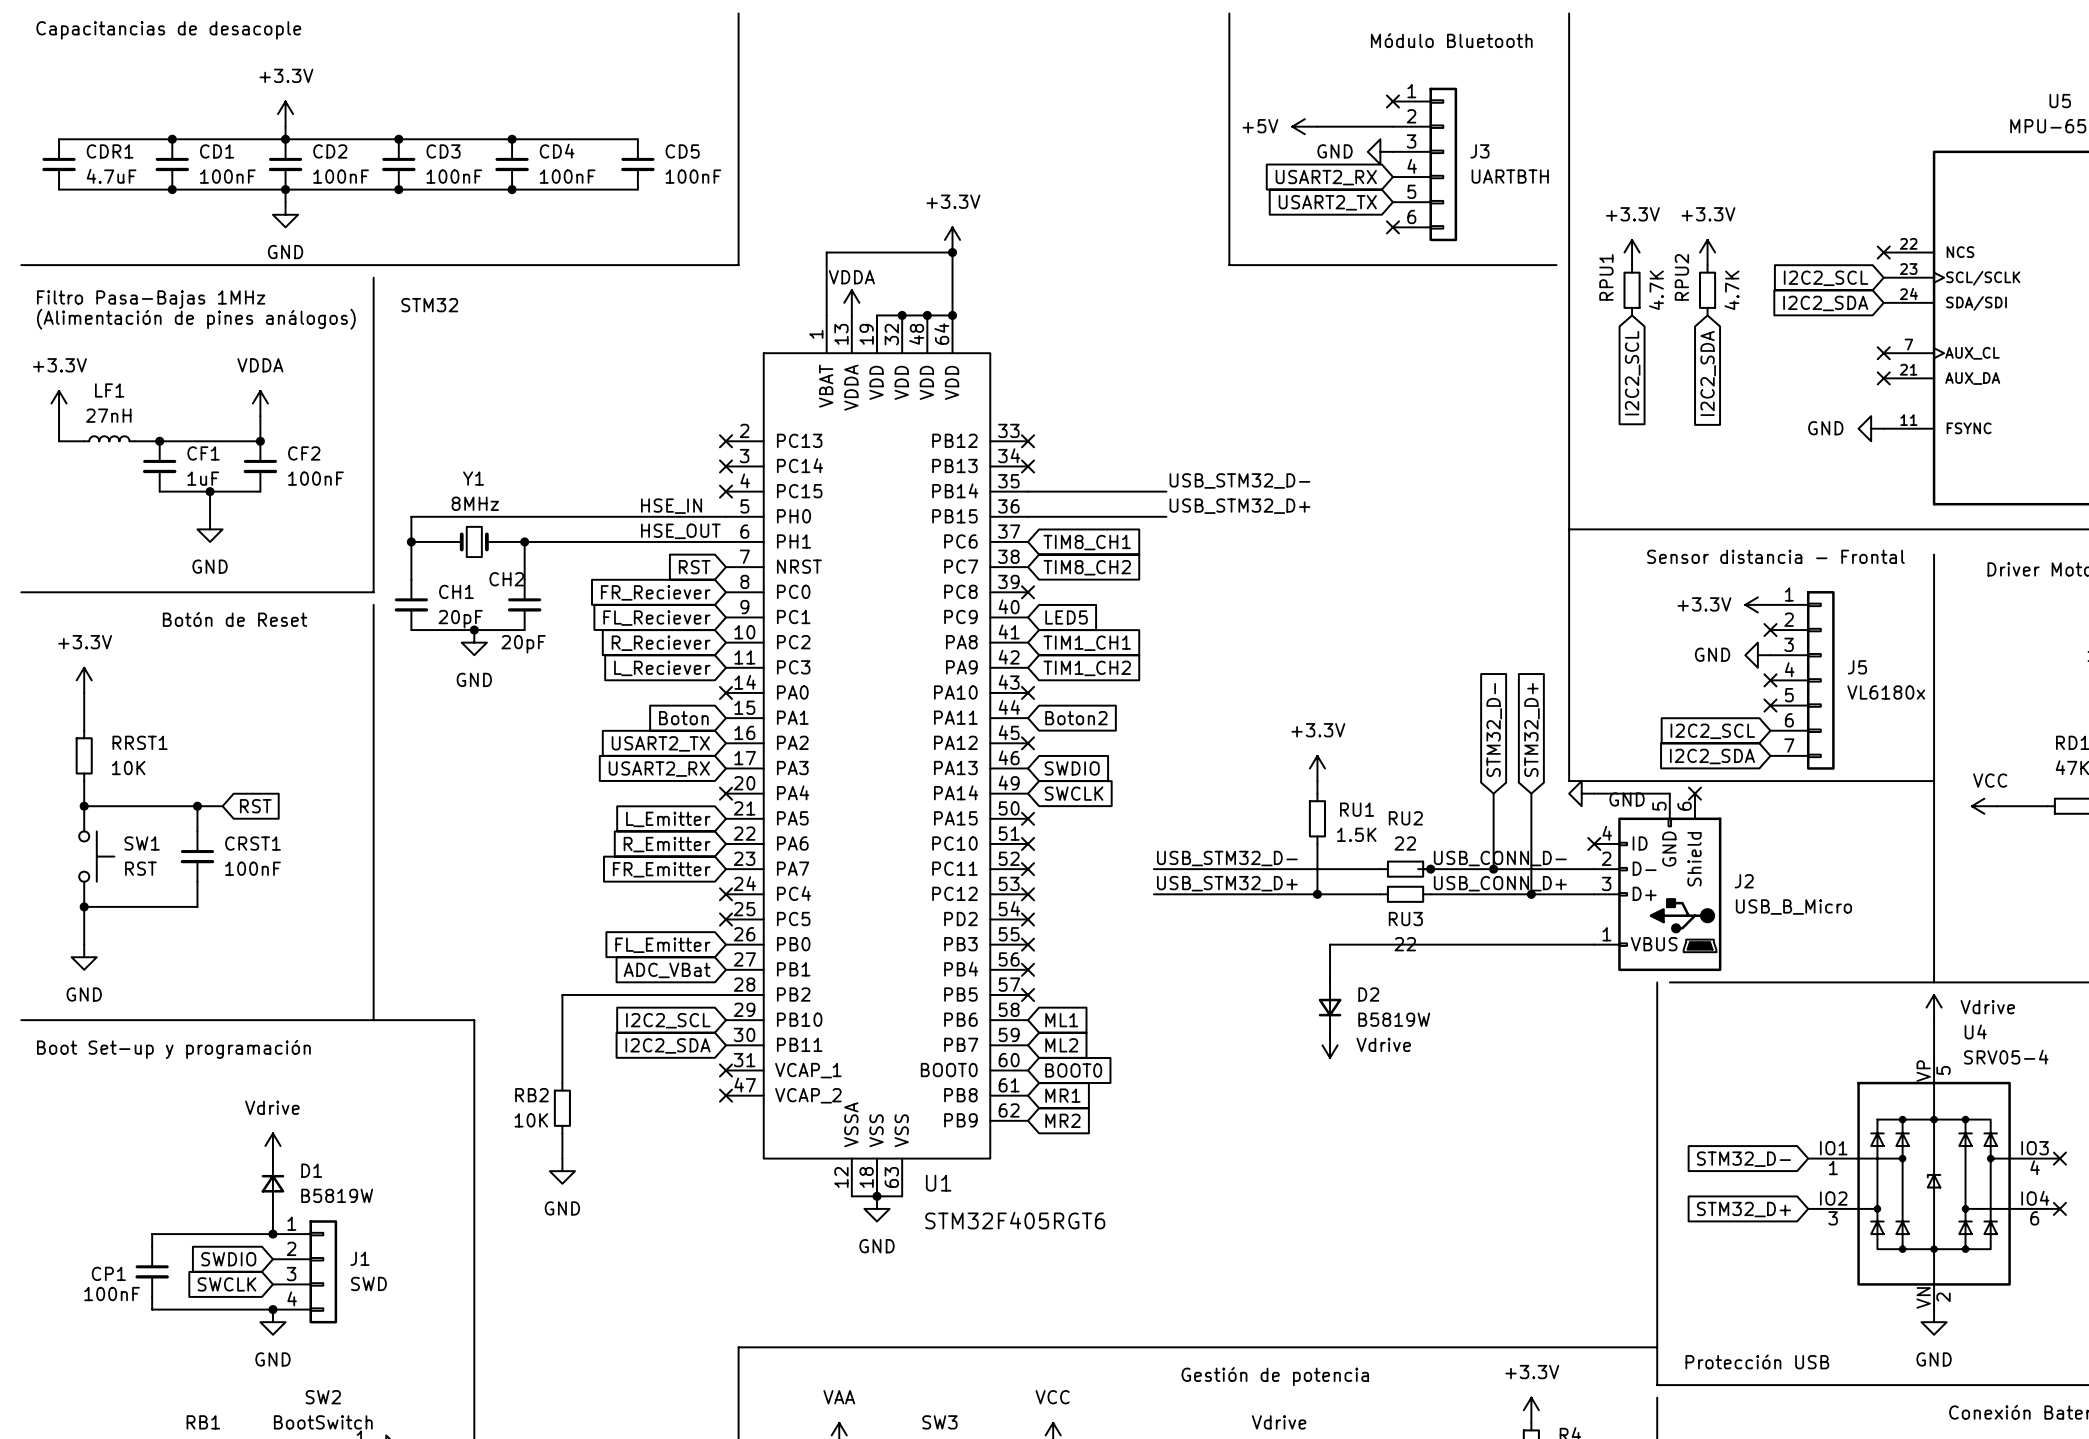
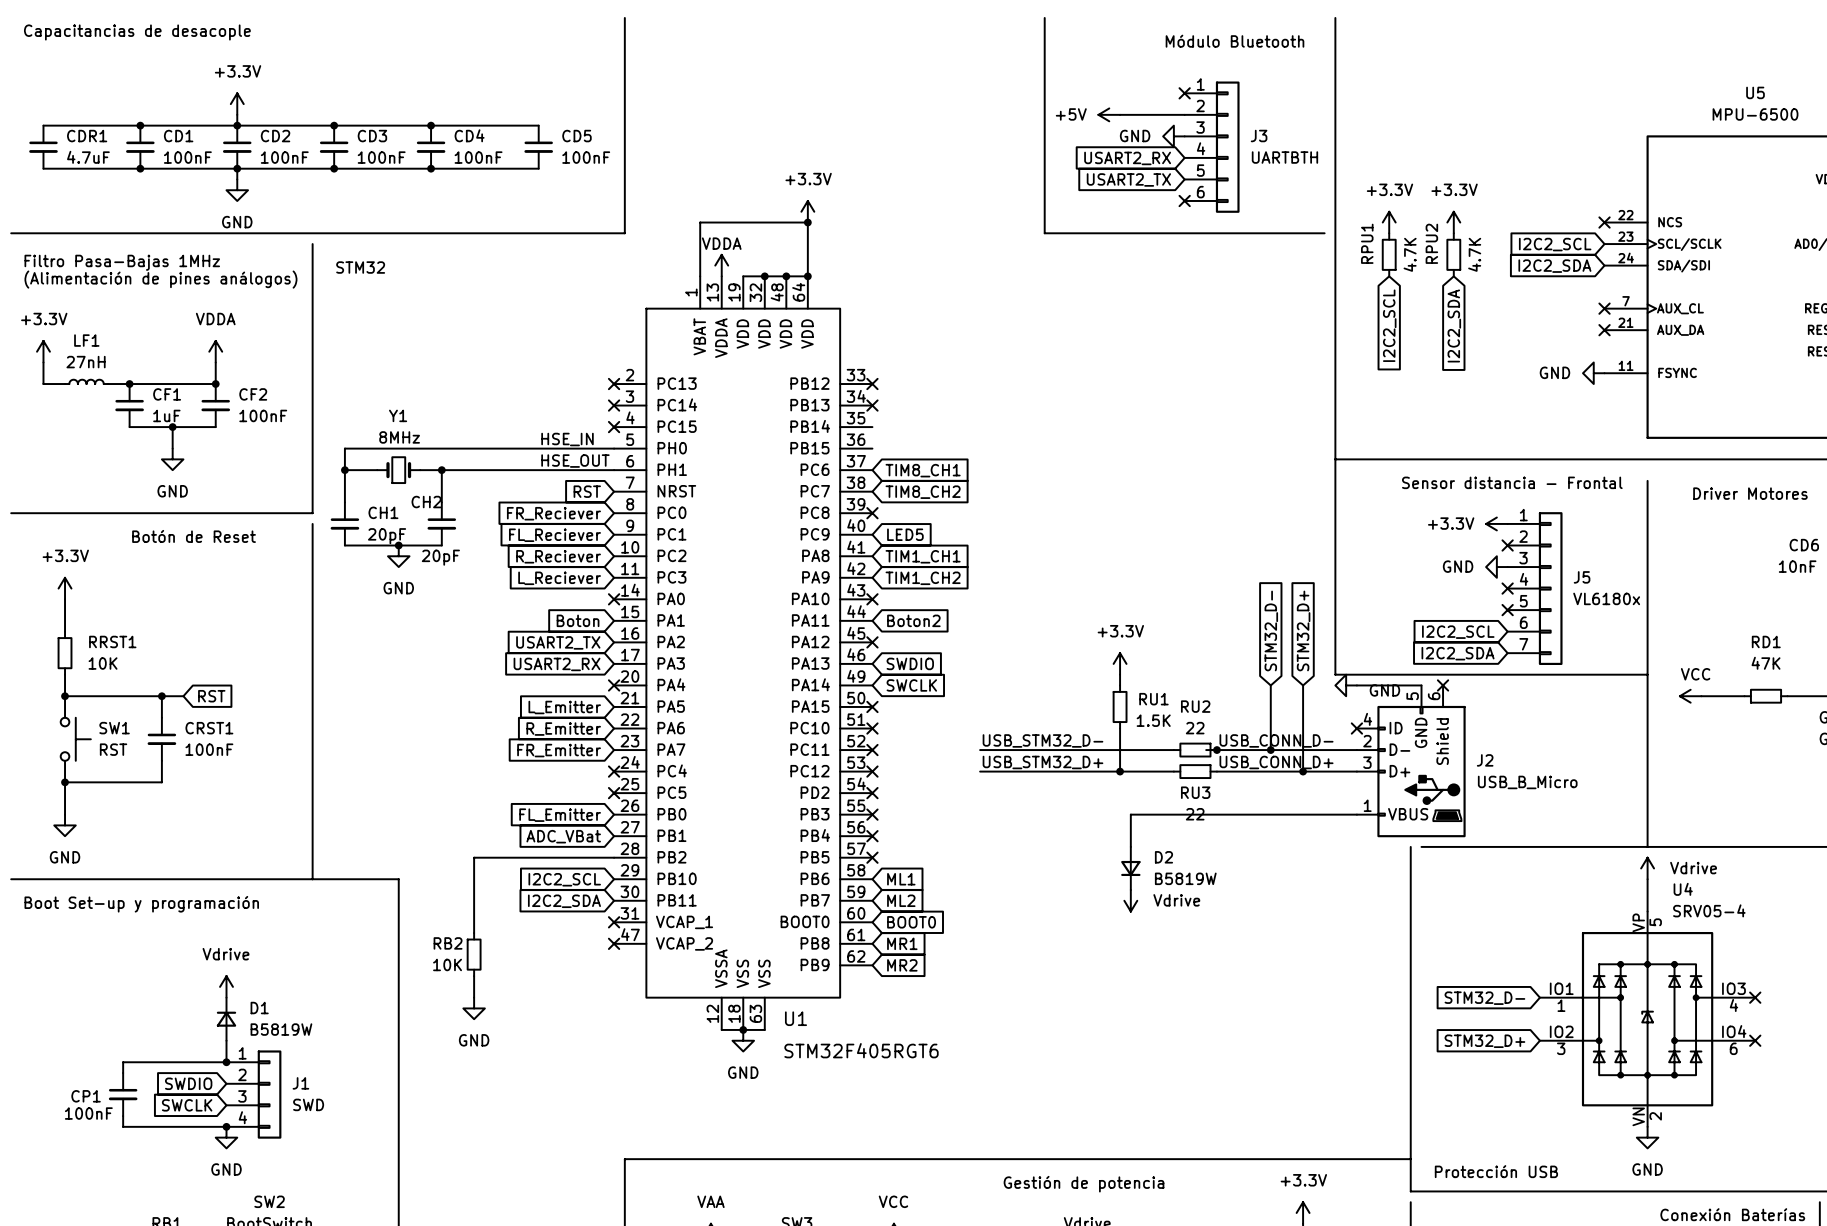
label: USB_STM32_D- (1239, 480) -> none
wire: (1028, 491) (1166, 491) -> none
label: USB_STM32_D+ (1239, 506) -> none
wire: (1028, 516) (1166, 516) -> none

